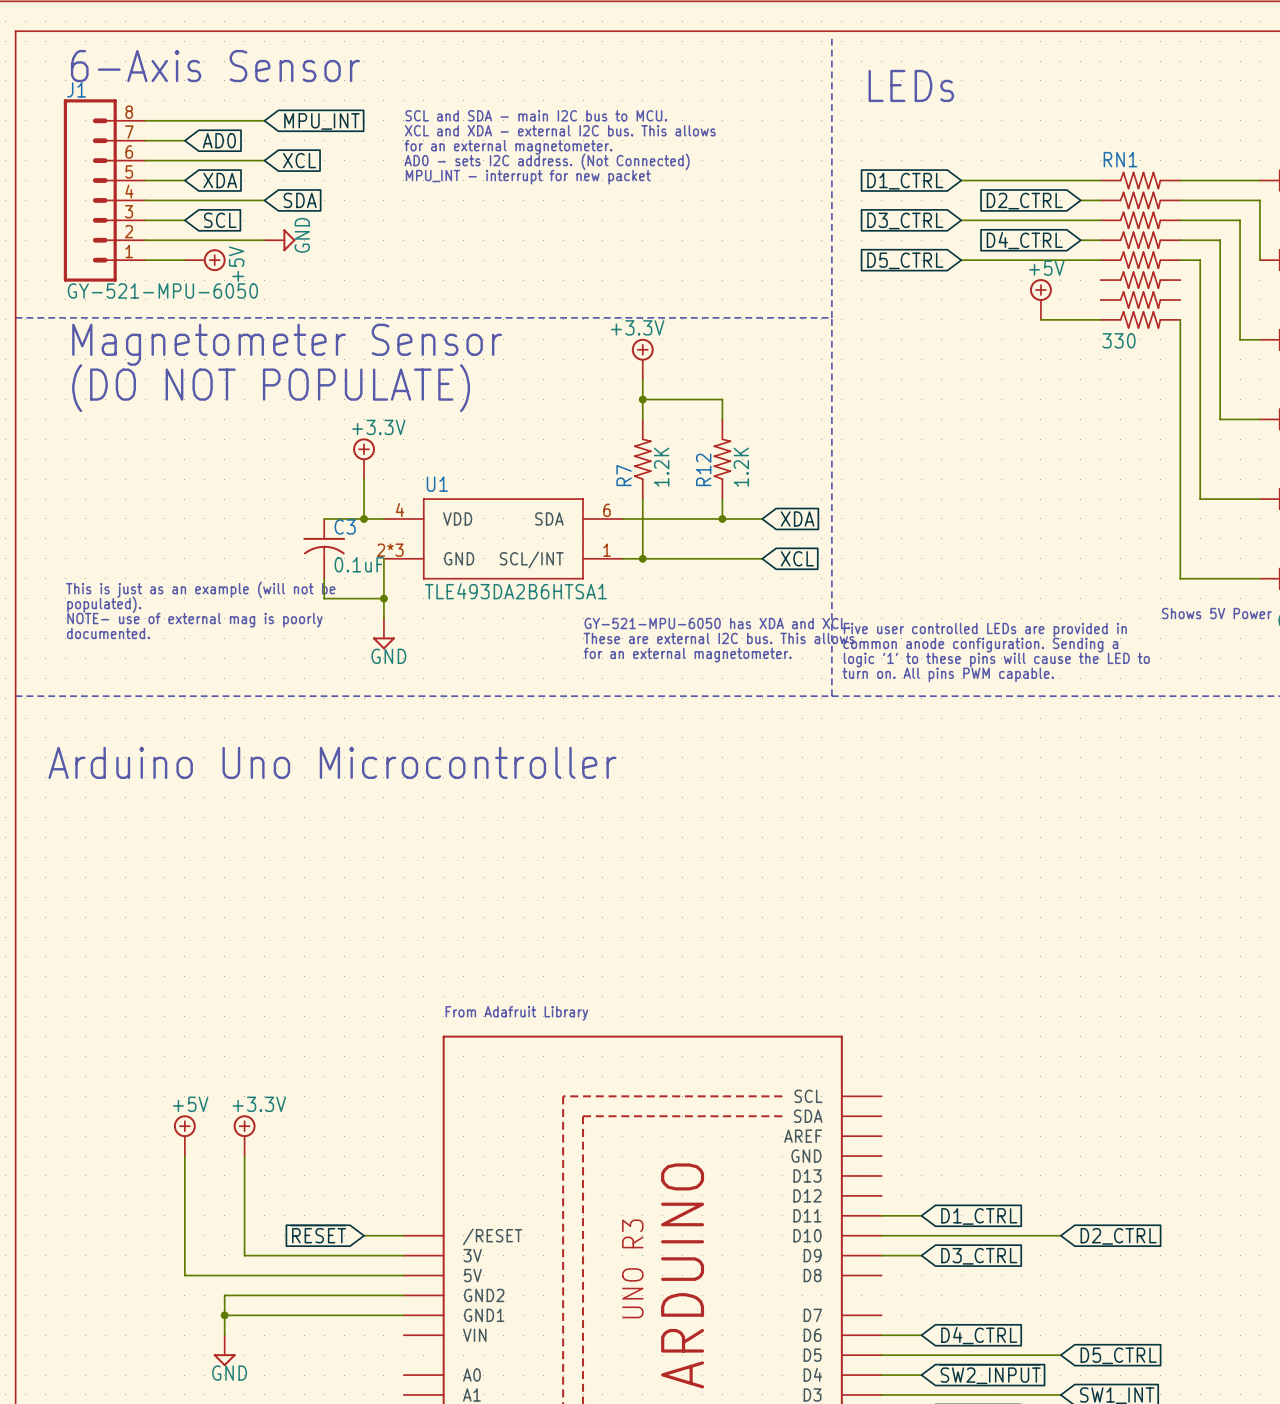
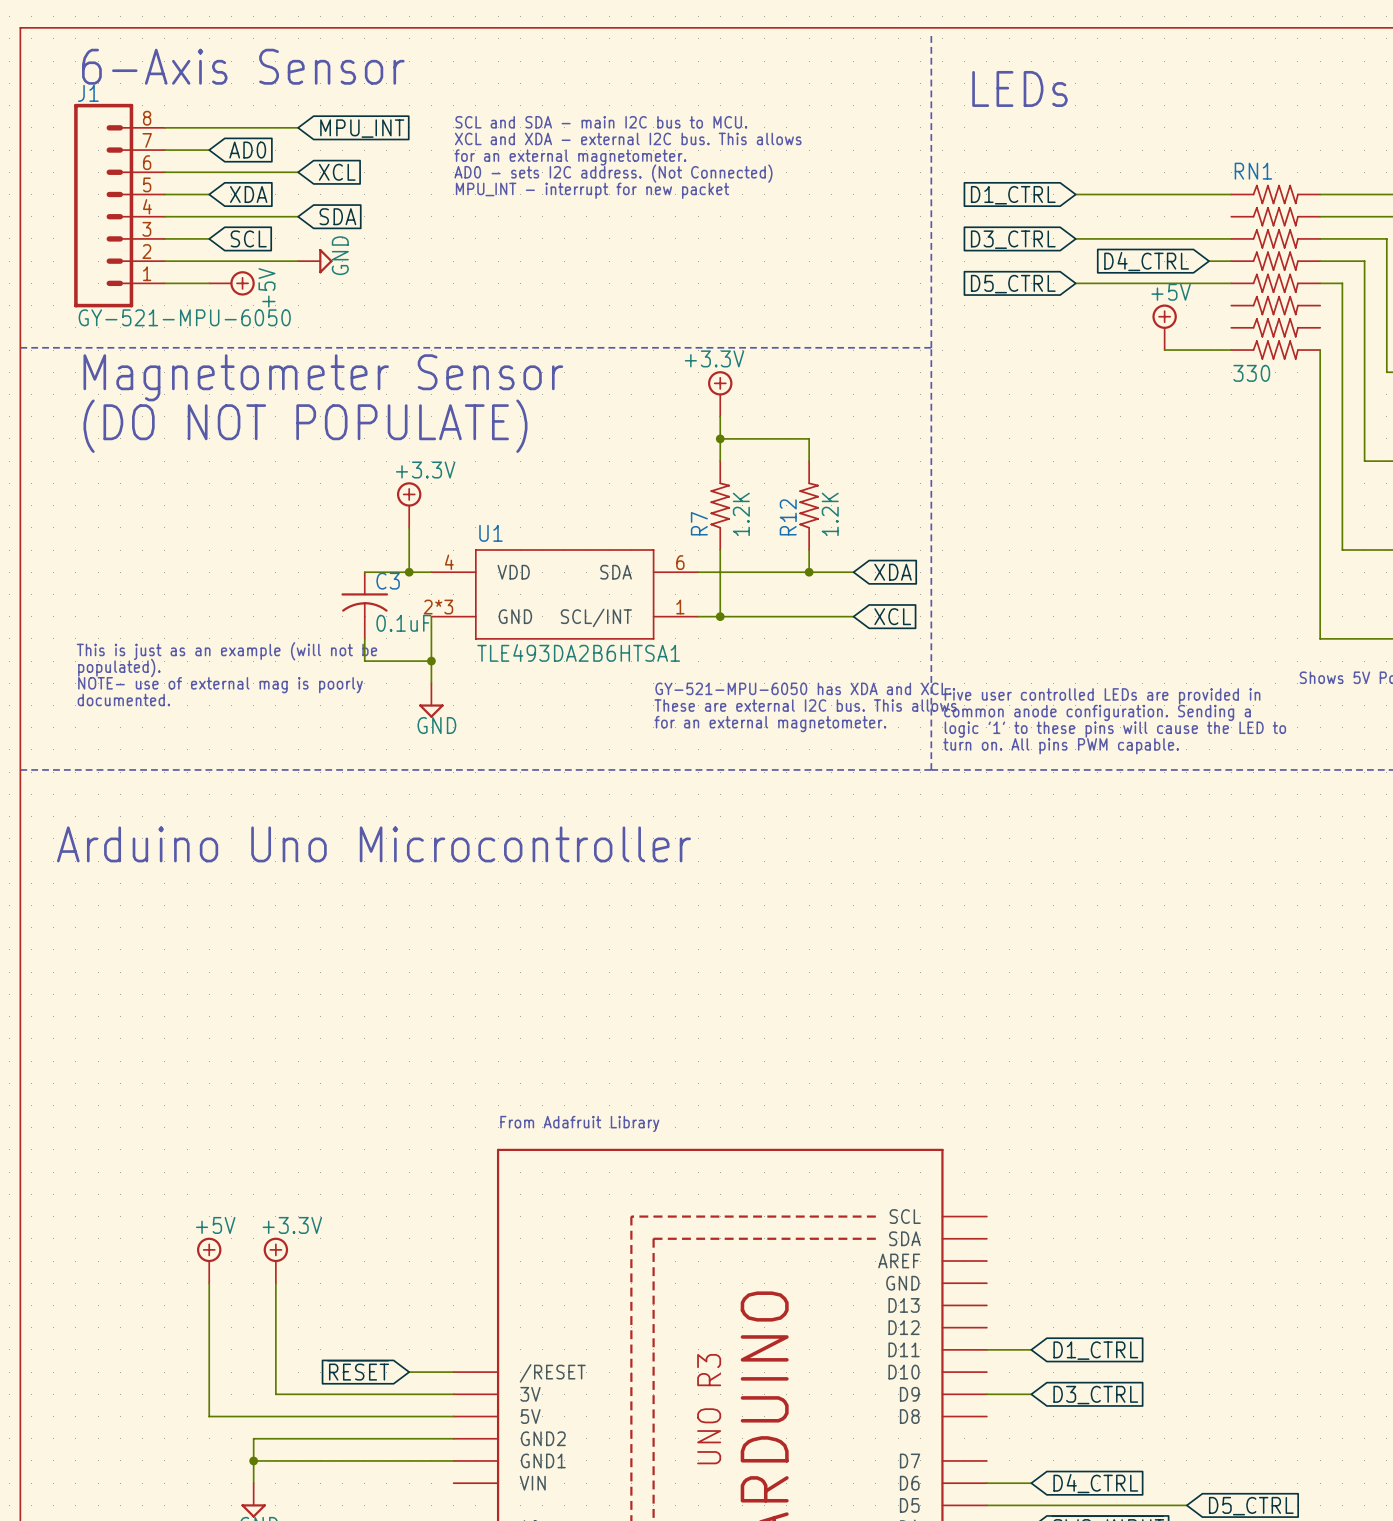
wire: (1080, 200) (1100, 200) -> none
global label: D2_CTRL (1024, 201) -> none
wire: (881, 1235) (1060, 1235) -> none
global label: D2_CTRL (1118, 1236) -> none

